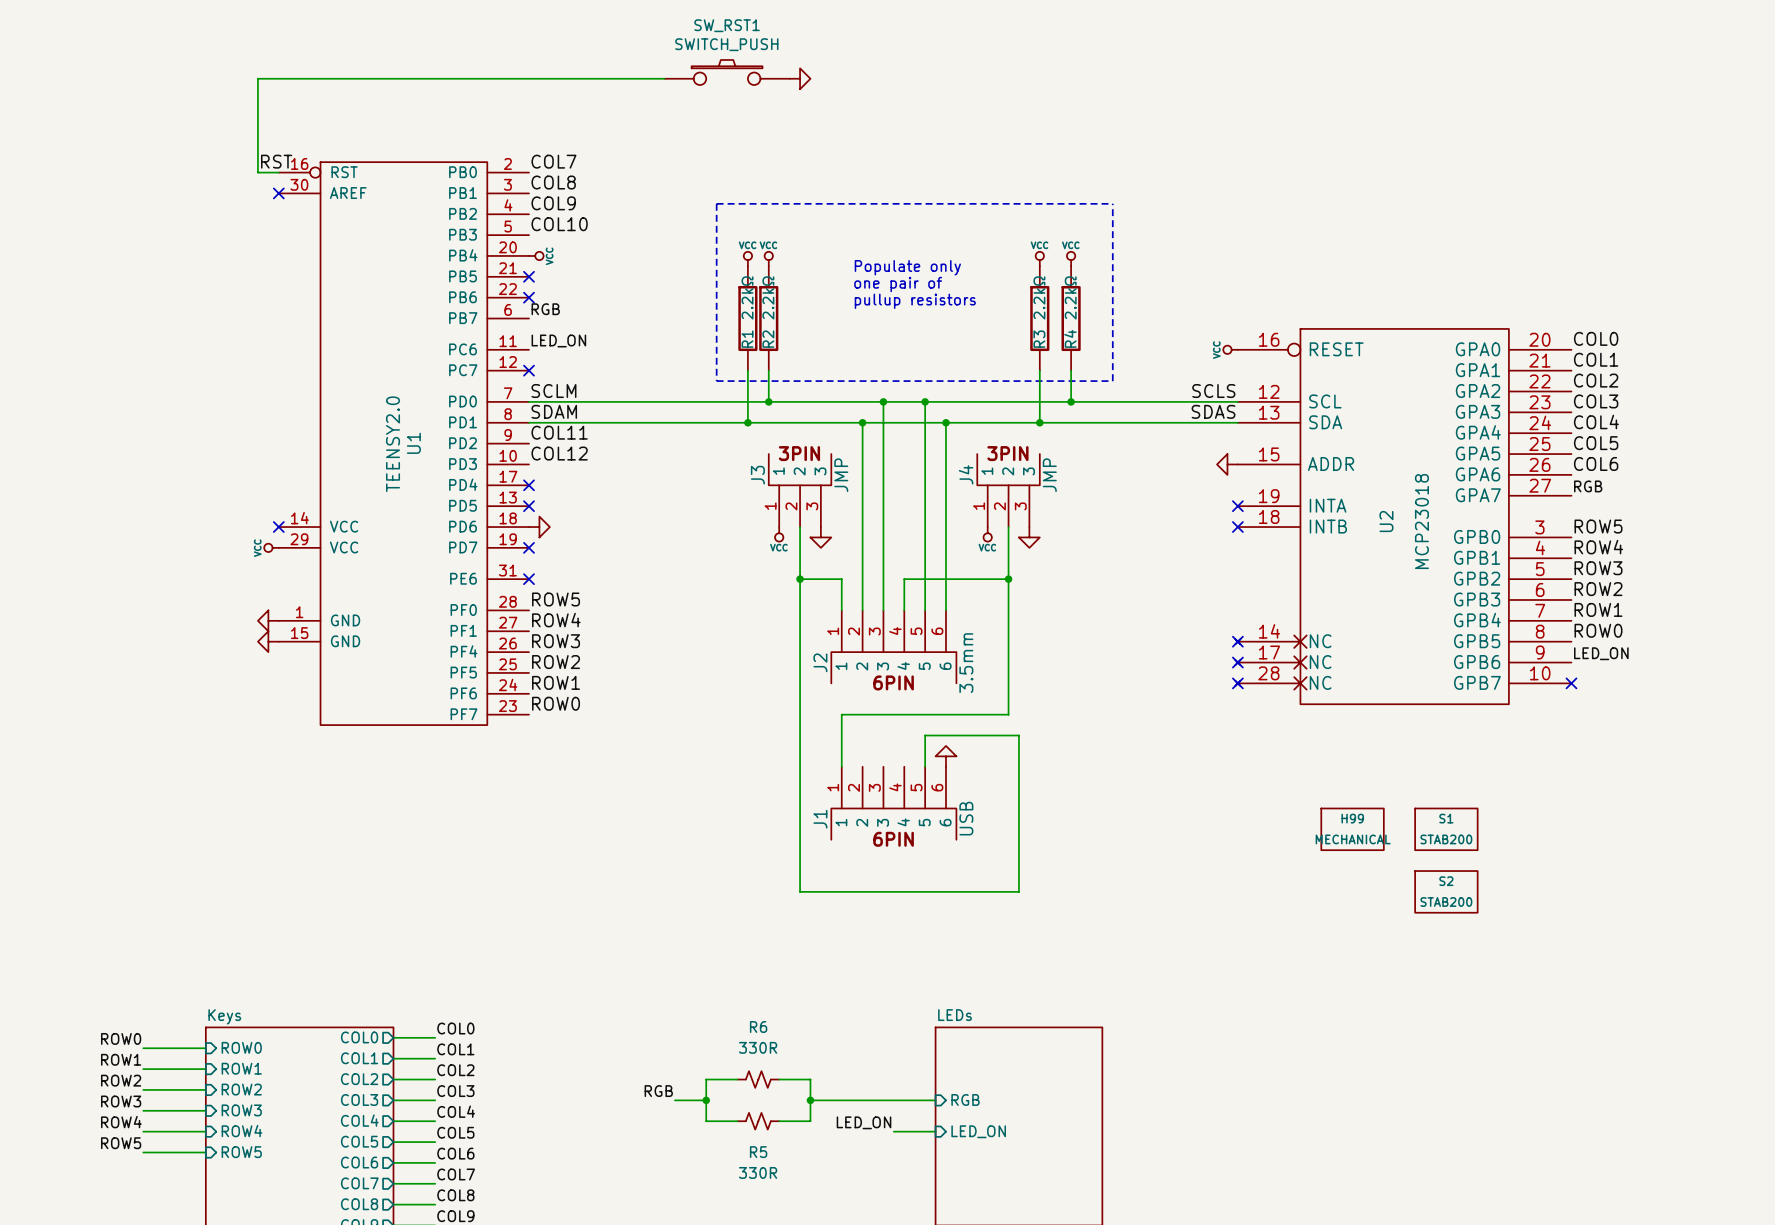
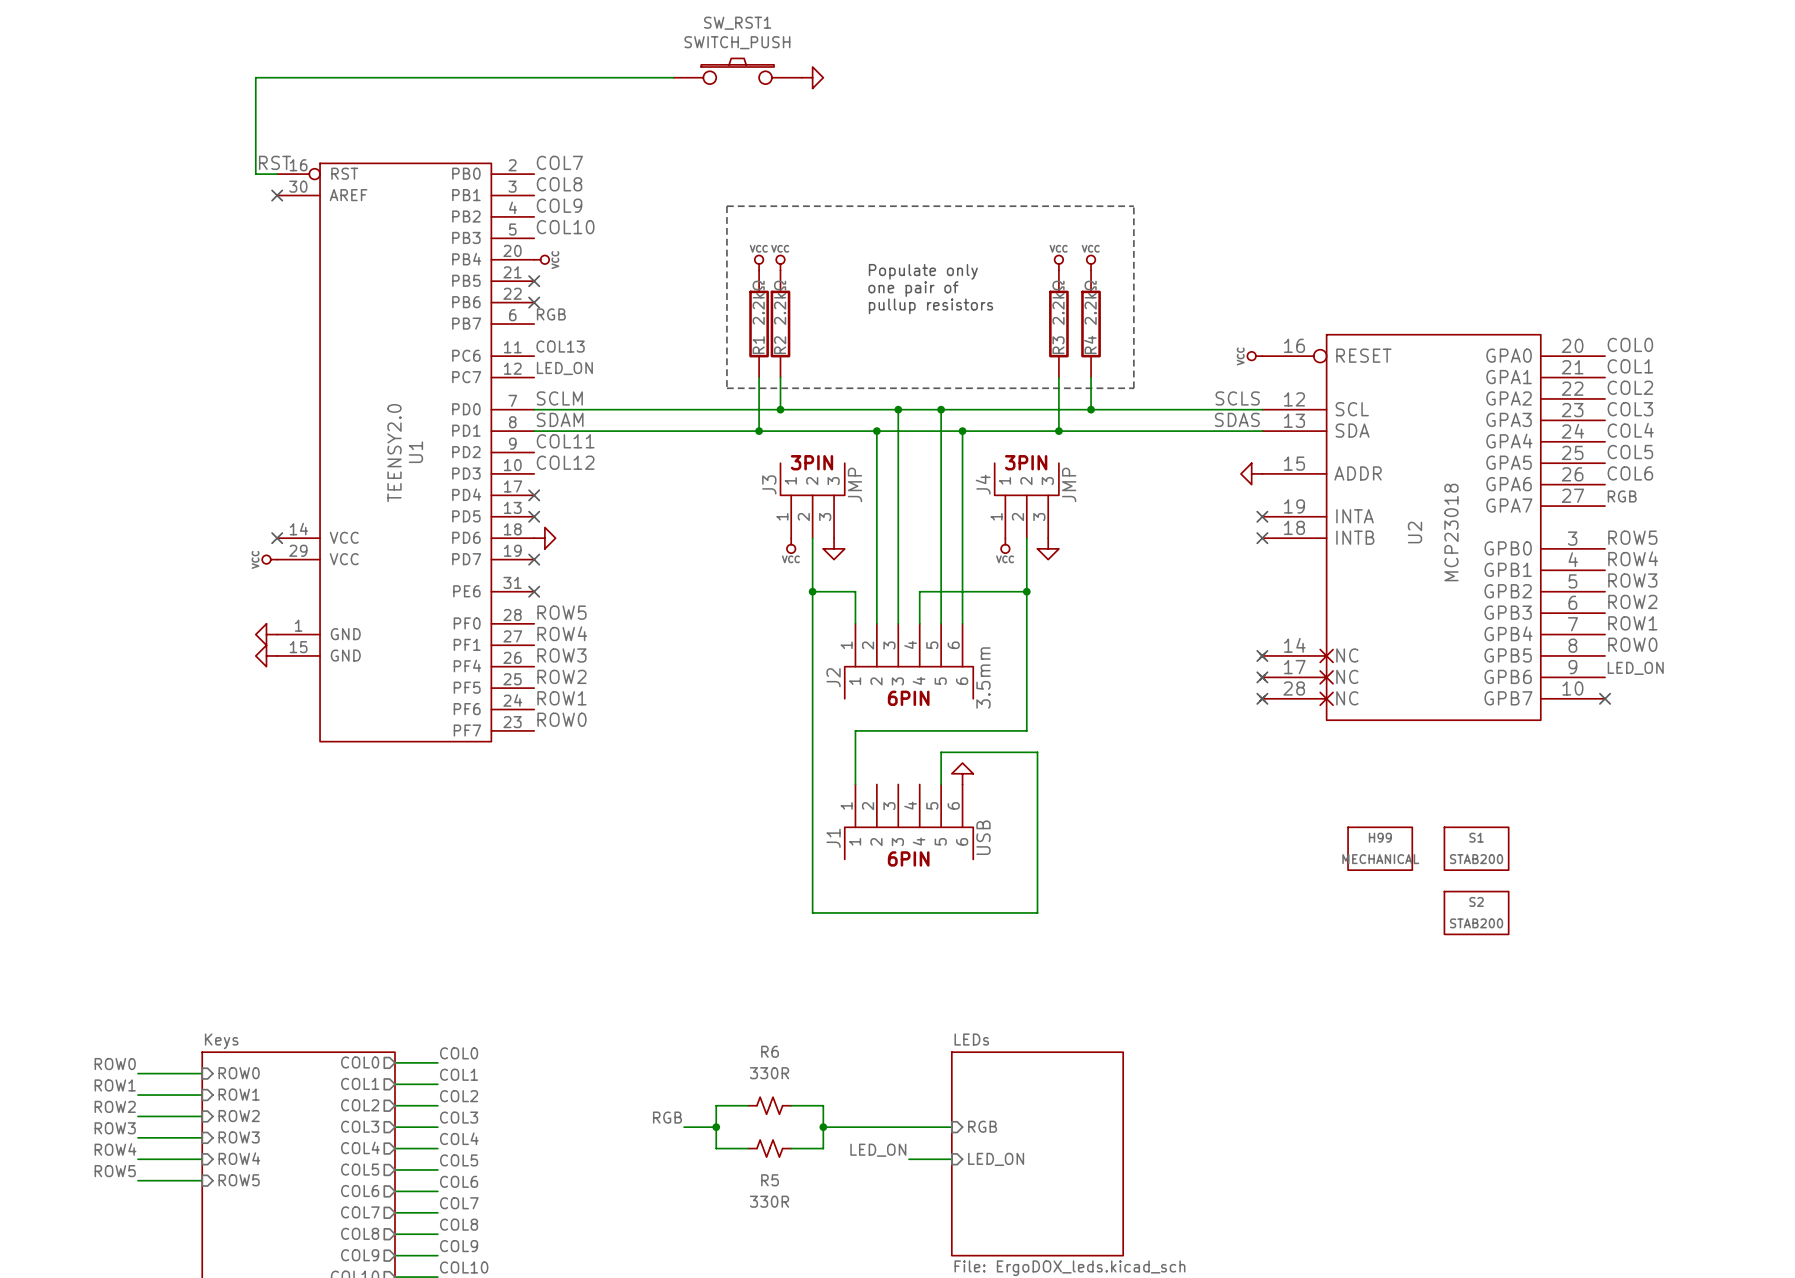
label: LED_ON (558, 340) -> COL13 (560, 346)
label: none -> LED_ON (564, 368)
no-connect mark: (529, 370) -> none

